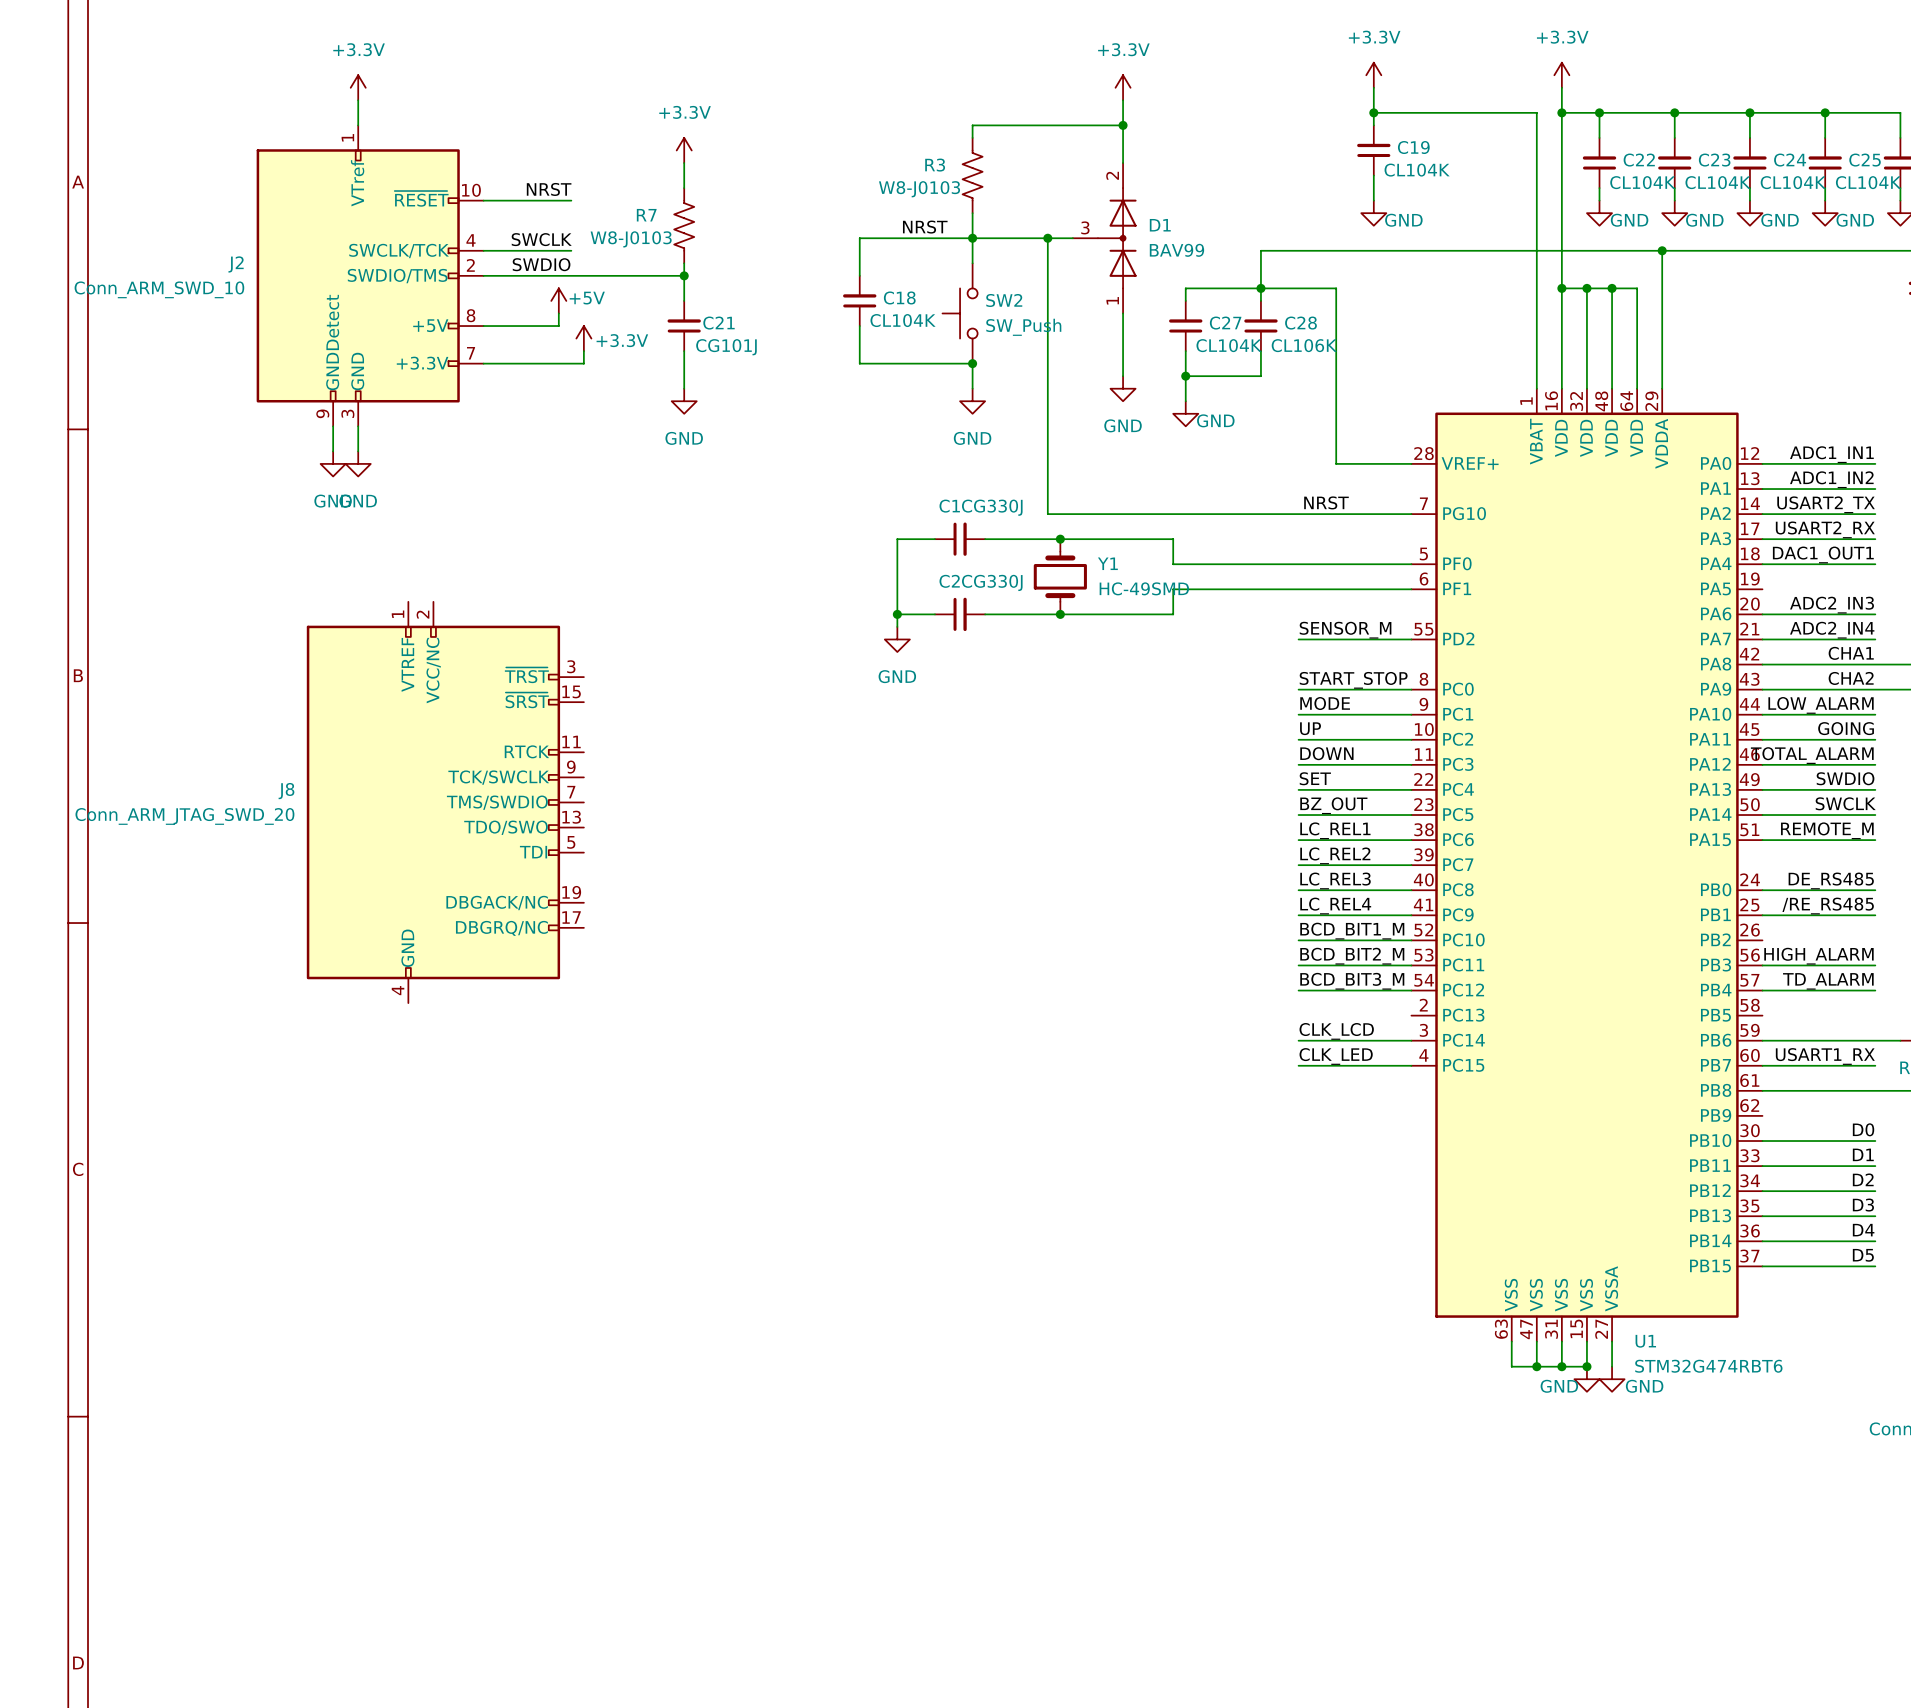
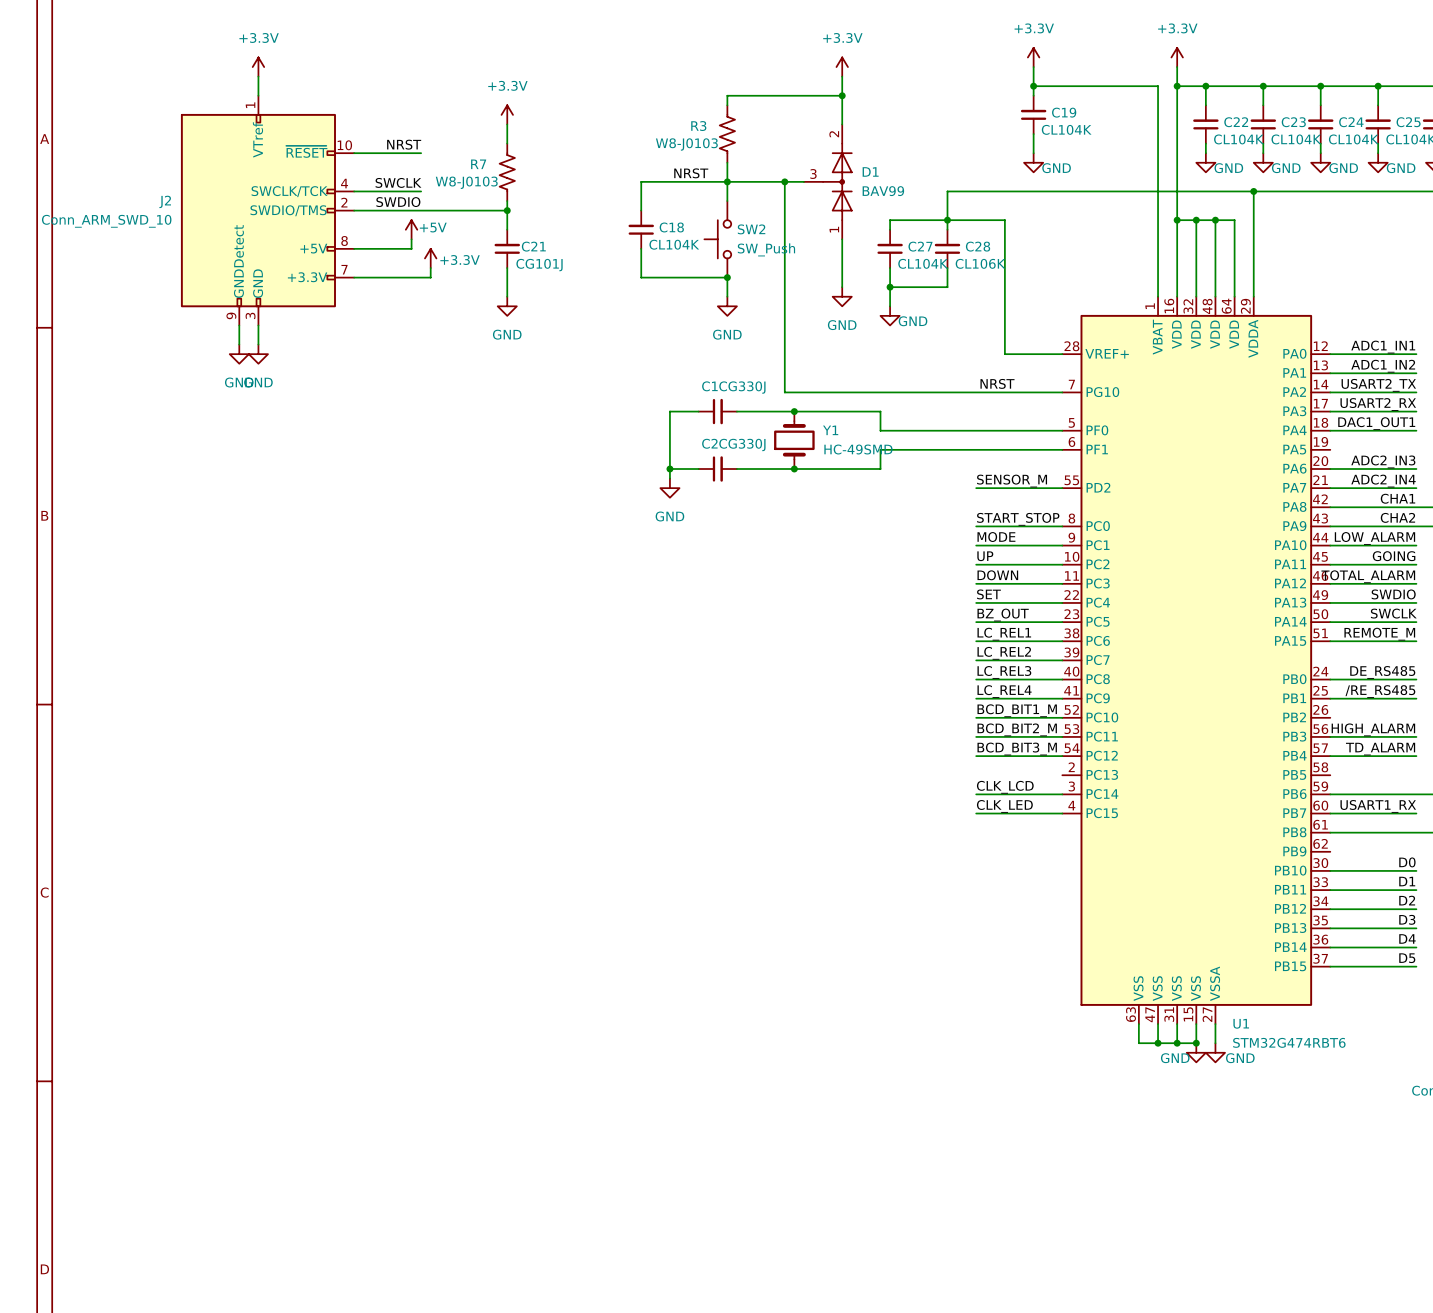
J8: Conn_ARM_JTAG_SWD_20 (445, 802) -> none

